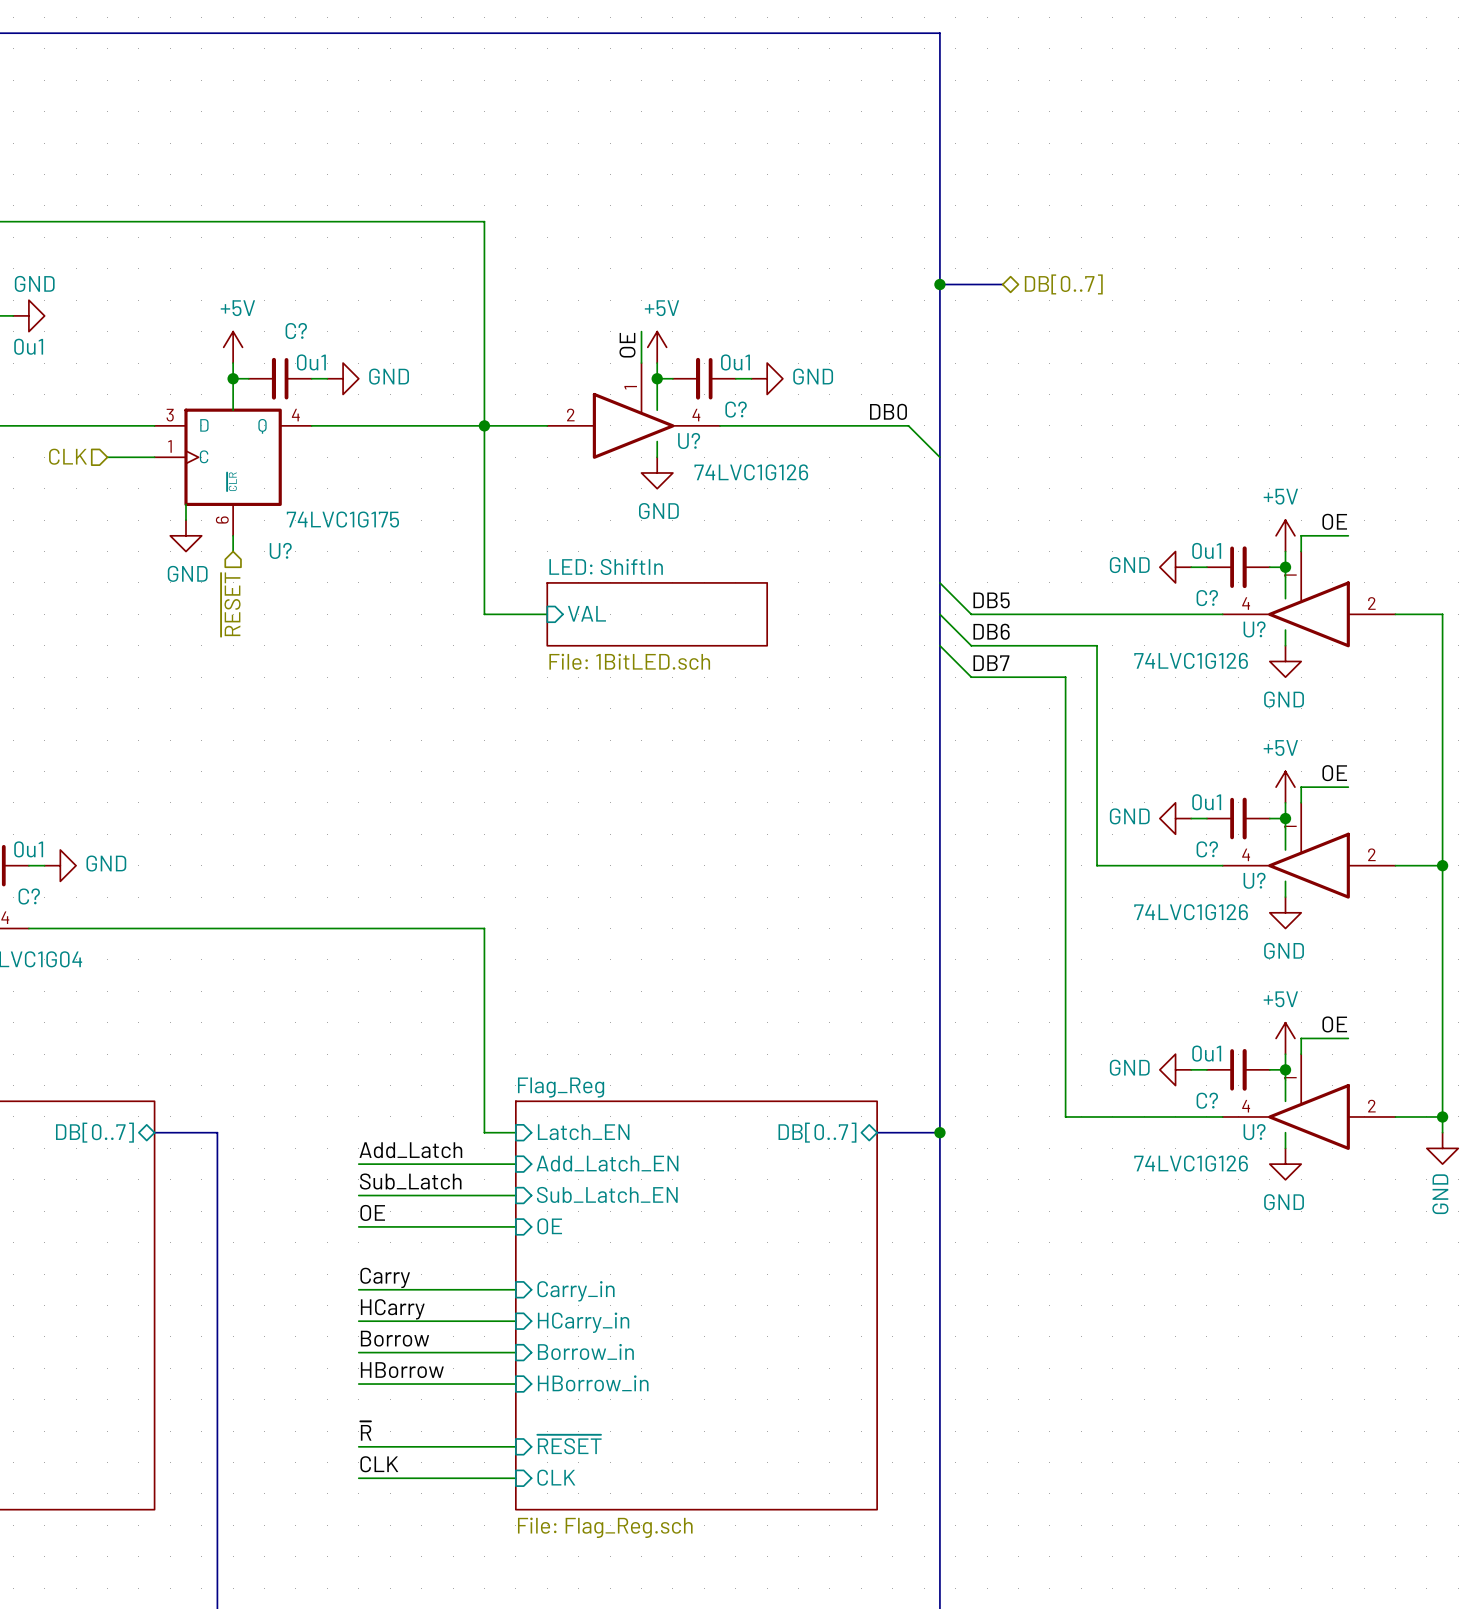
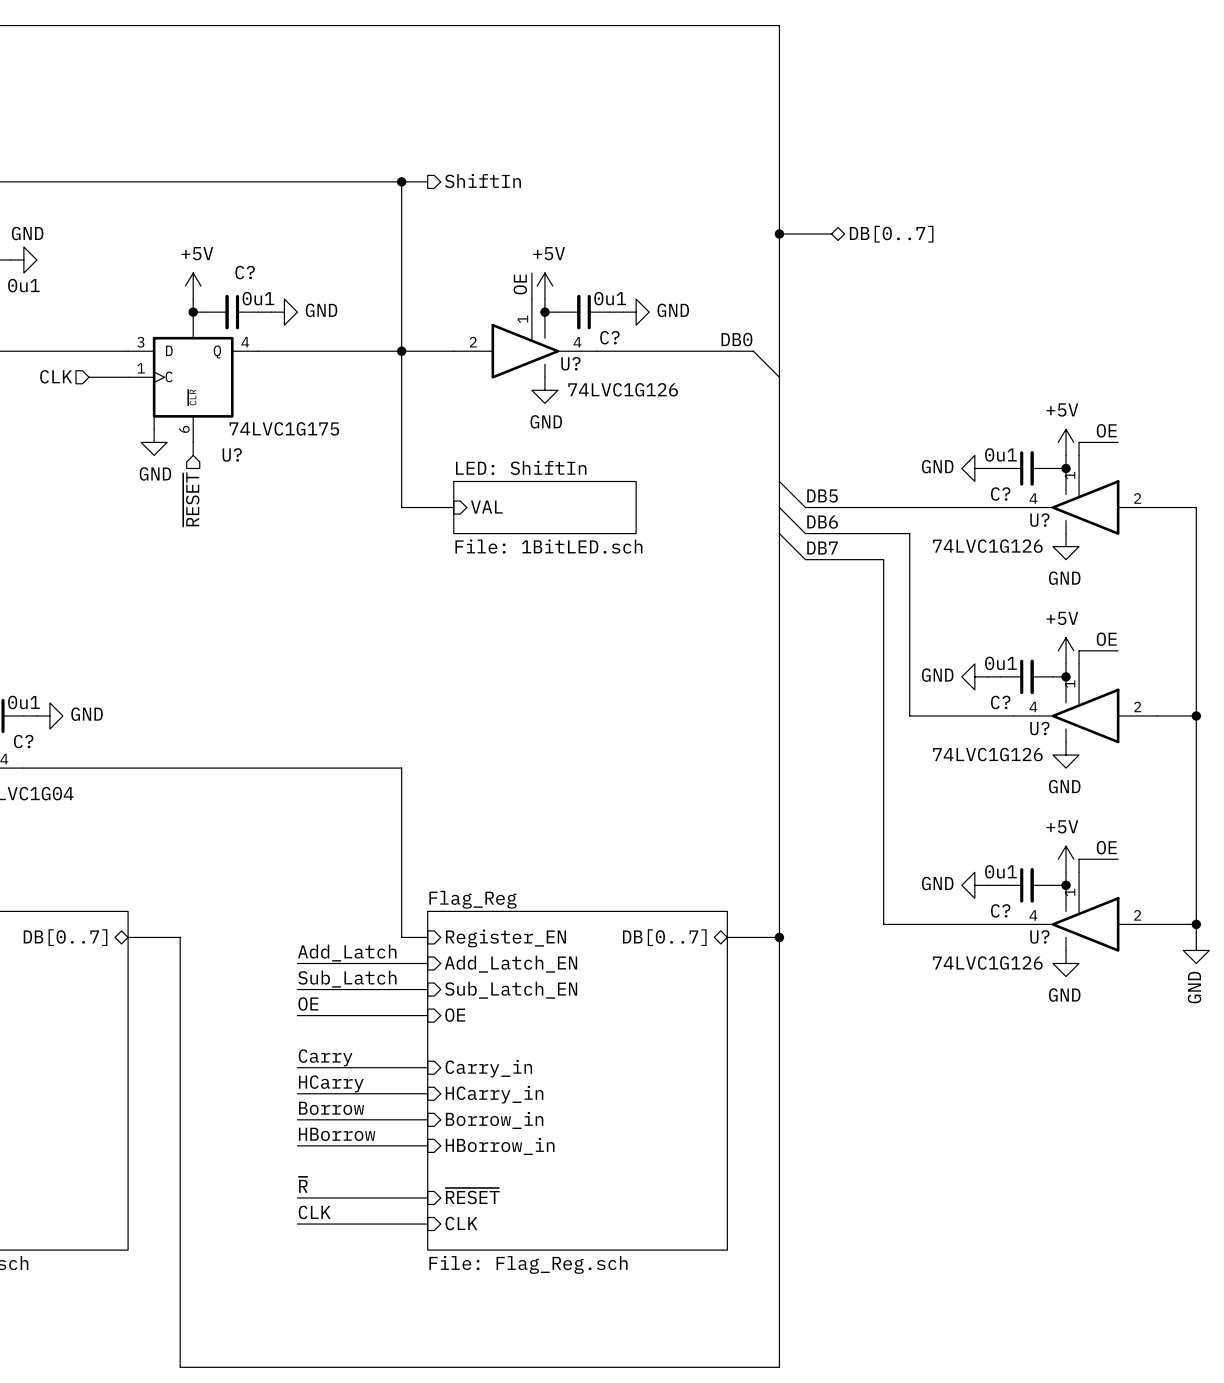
wire: none -> (401, 181) (427, 181)
junction: none -> (401, 181)
hierarchical label: none -> ShiftIn (483, 181)
sheet pin: Latch_EN (583, 1132) -> Register_EN (505, 938)

